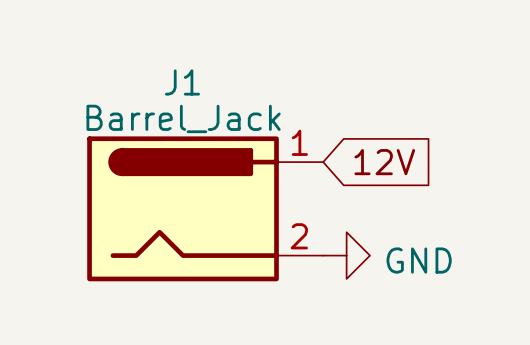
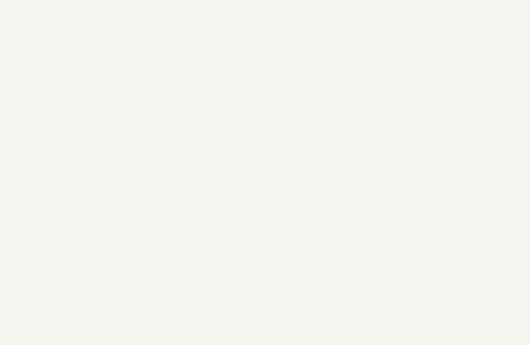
global label: 12V (384, 162) -> none
J1: Barrel_Jack (205, 208) -> none
power symbol: GND (346, 255) -> none

